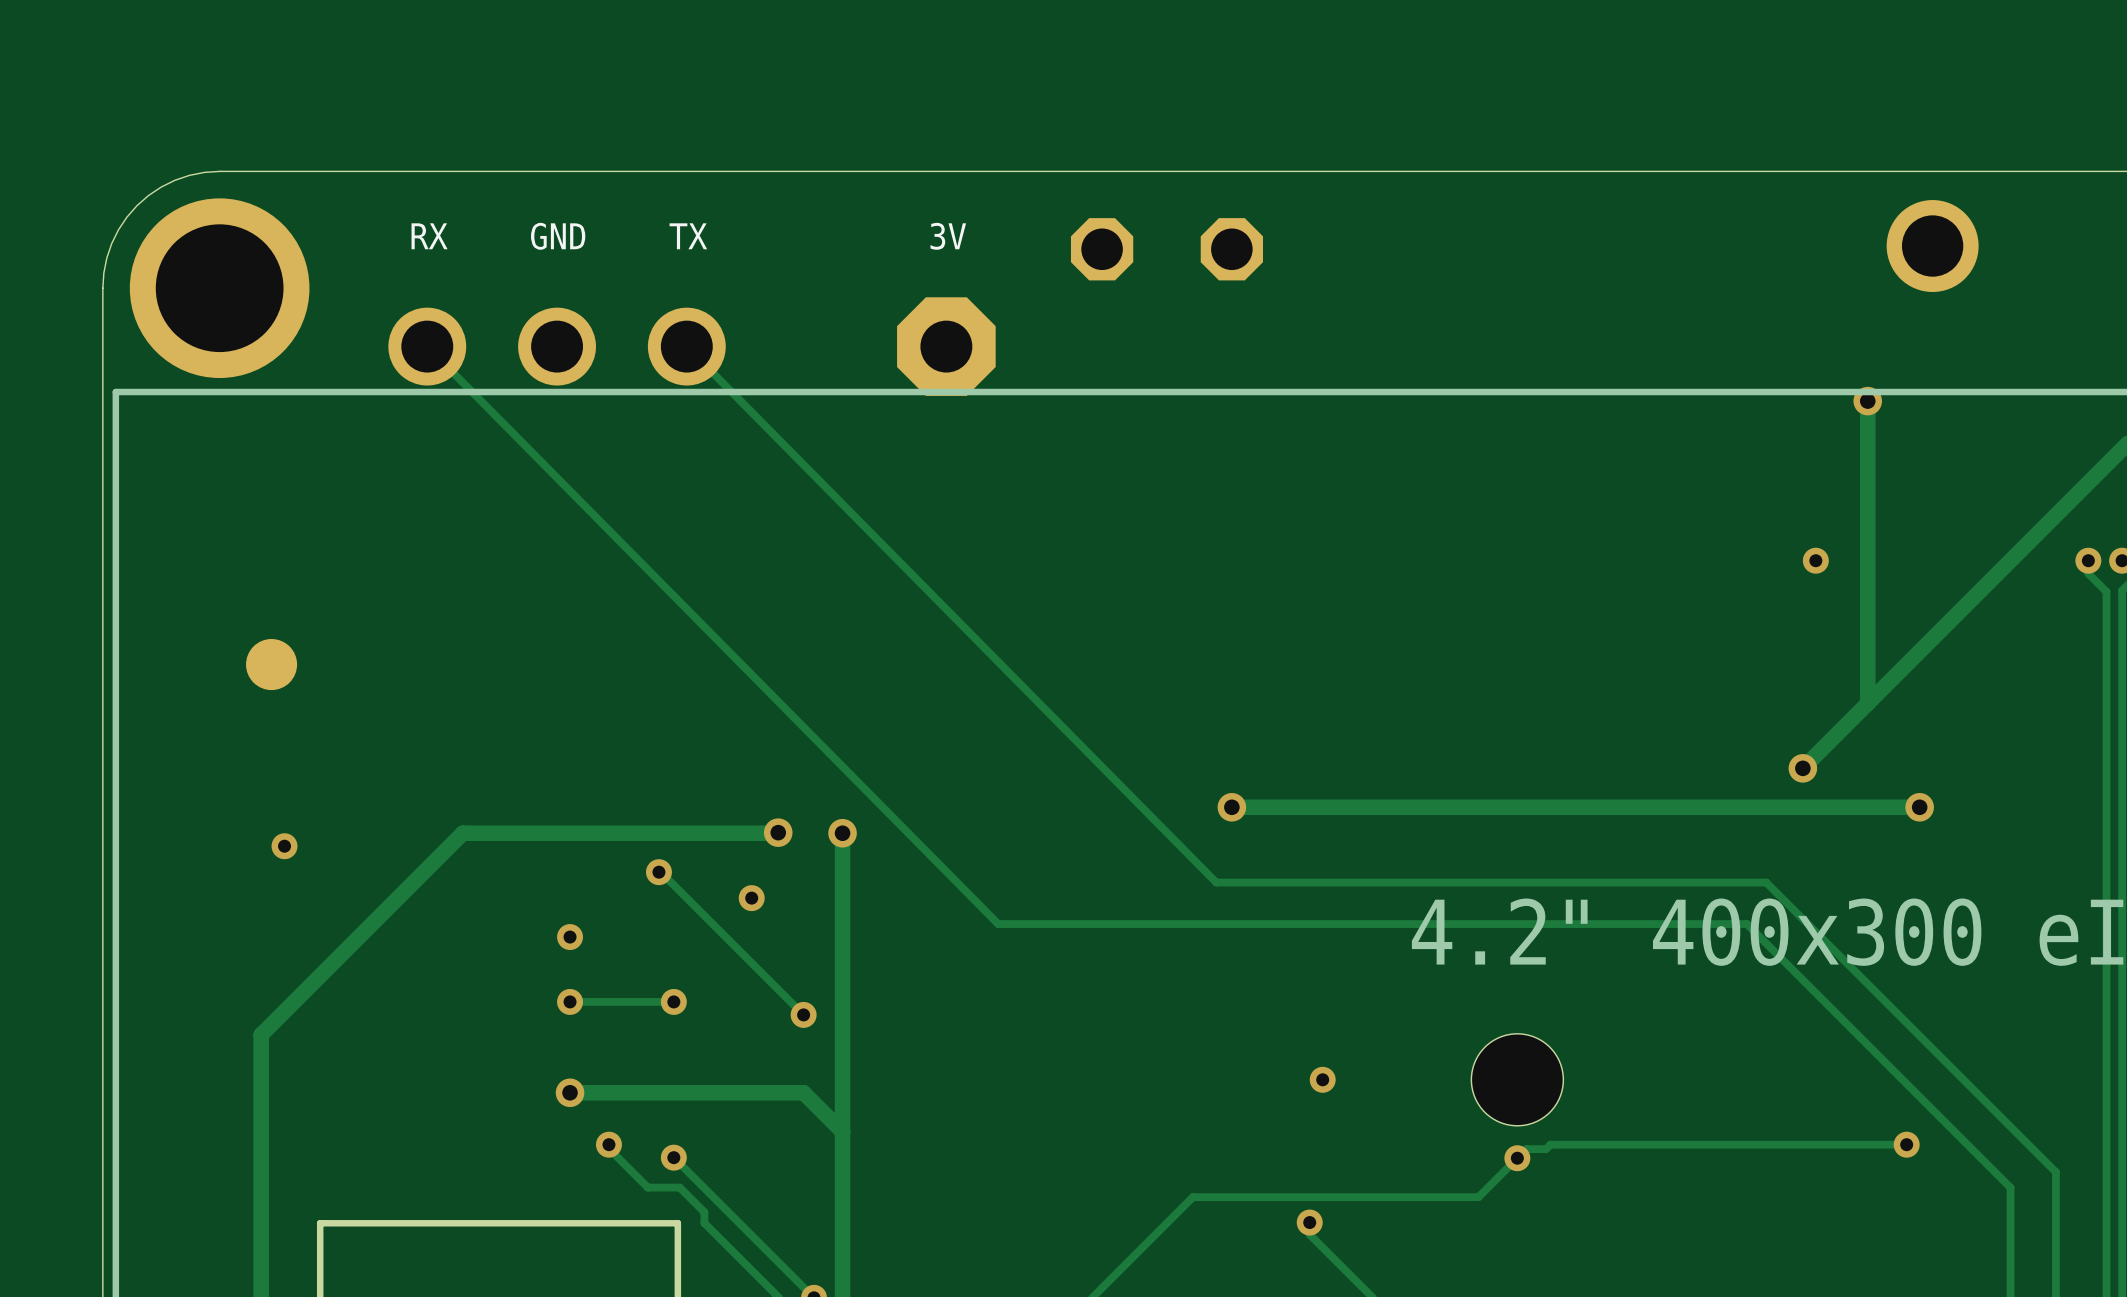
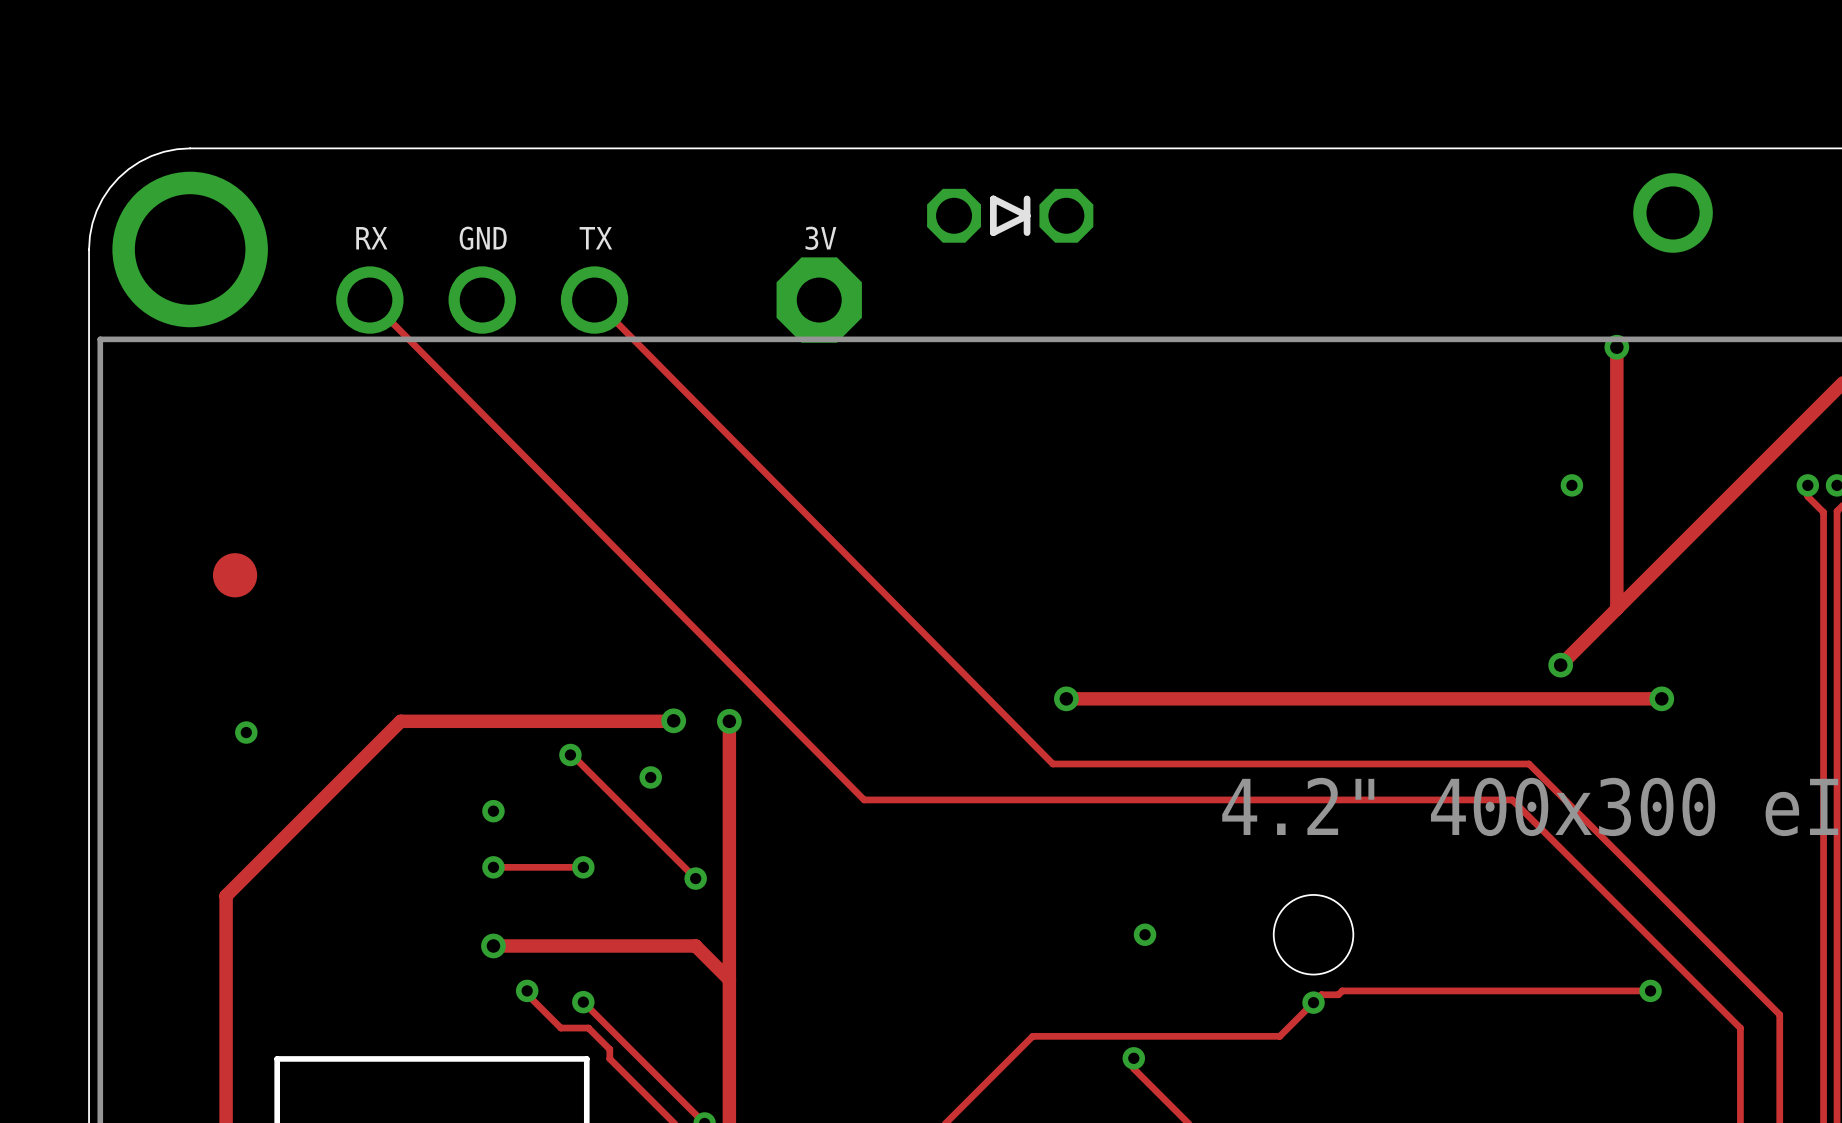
part footprint: [1070, 218, 1264, 281] -> [927, 188, 1094, 243]
text position: RX (429, 236) -> RX (371, 238)
text position: GND (558, 236) -> GND (483, 238)
text position: TX (688, 236) -> TX (595, 238)
text position: 3V (948, 236) -> 3V (820, 238)

